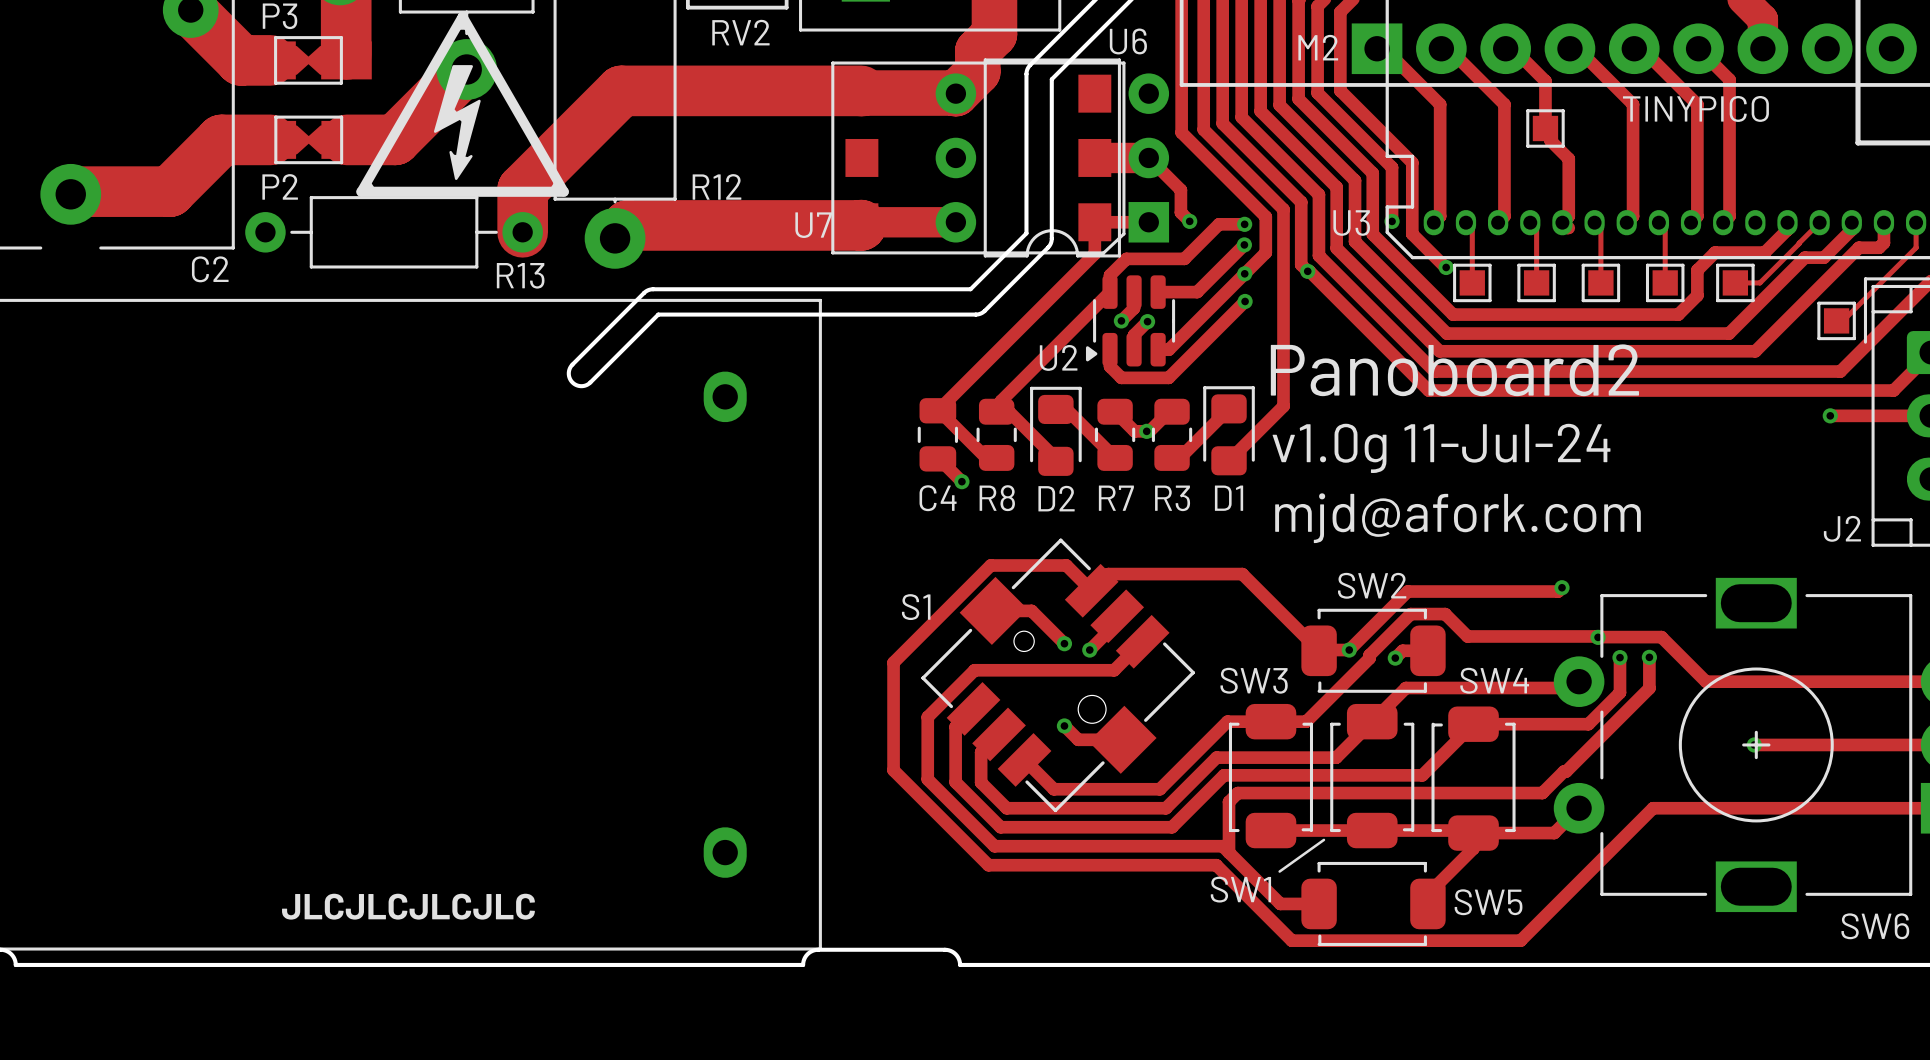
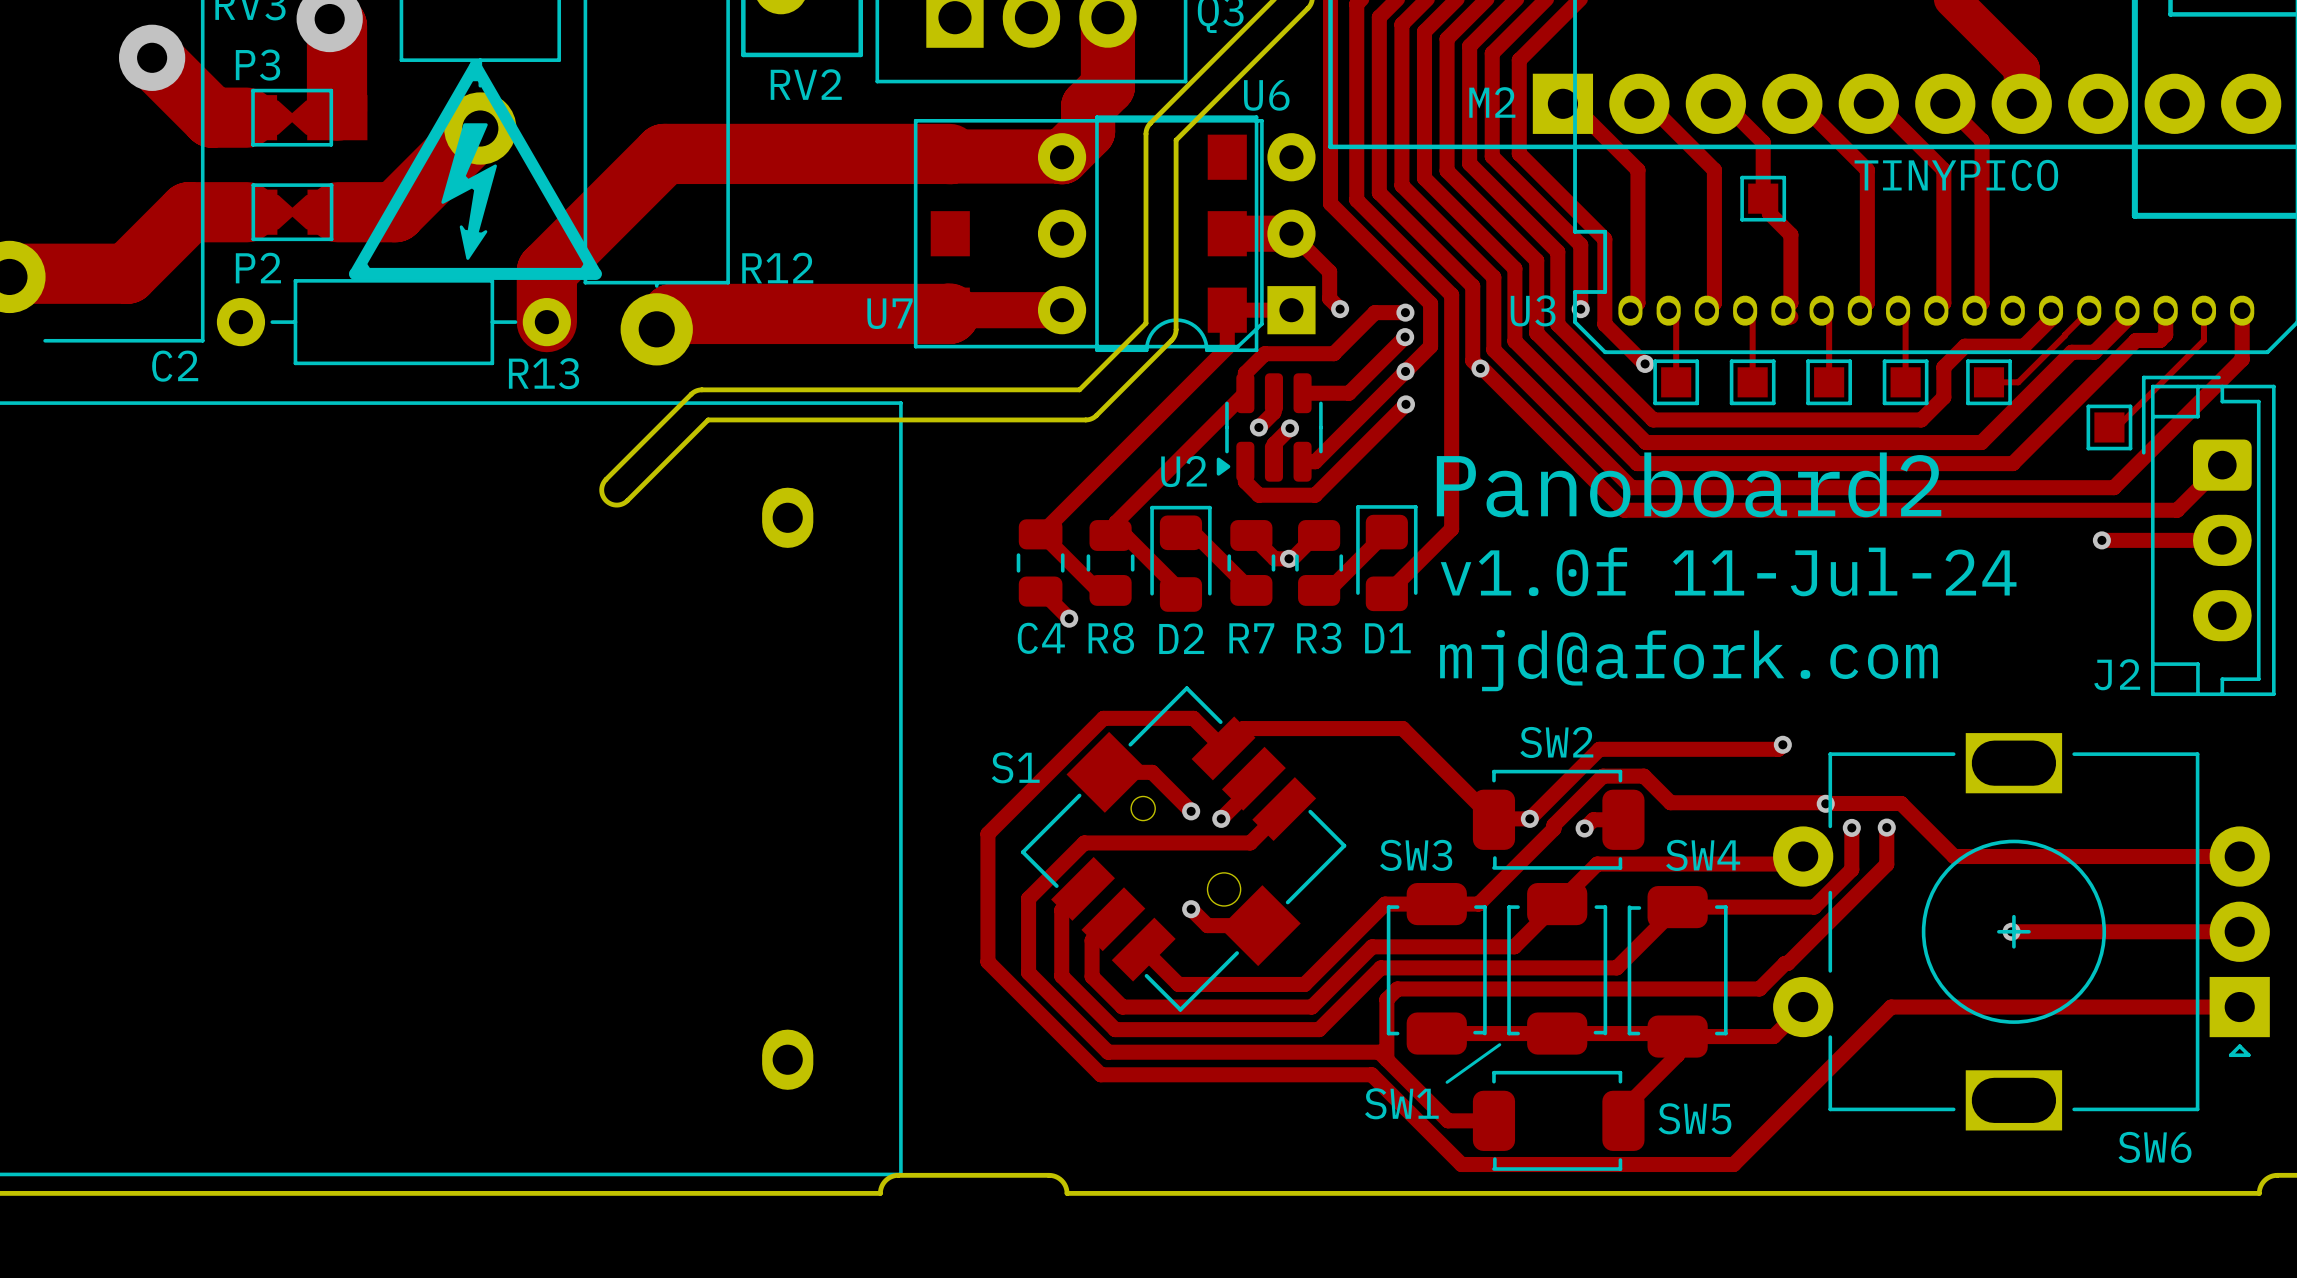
text: v1.0g 11-Jul-24 (1441, 448) -> v1.0f 11-Jul-24 (1728, 571)
text: JLCJLCJLCJLC (408, 906) -> none

